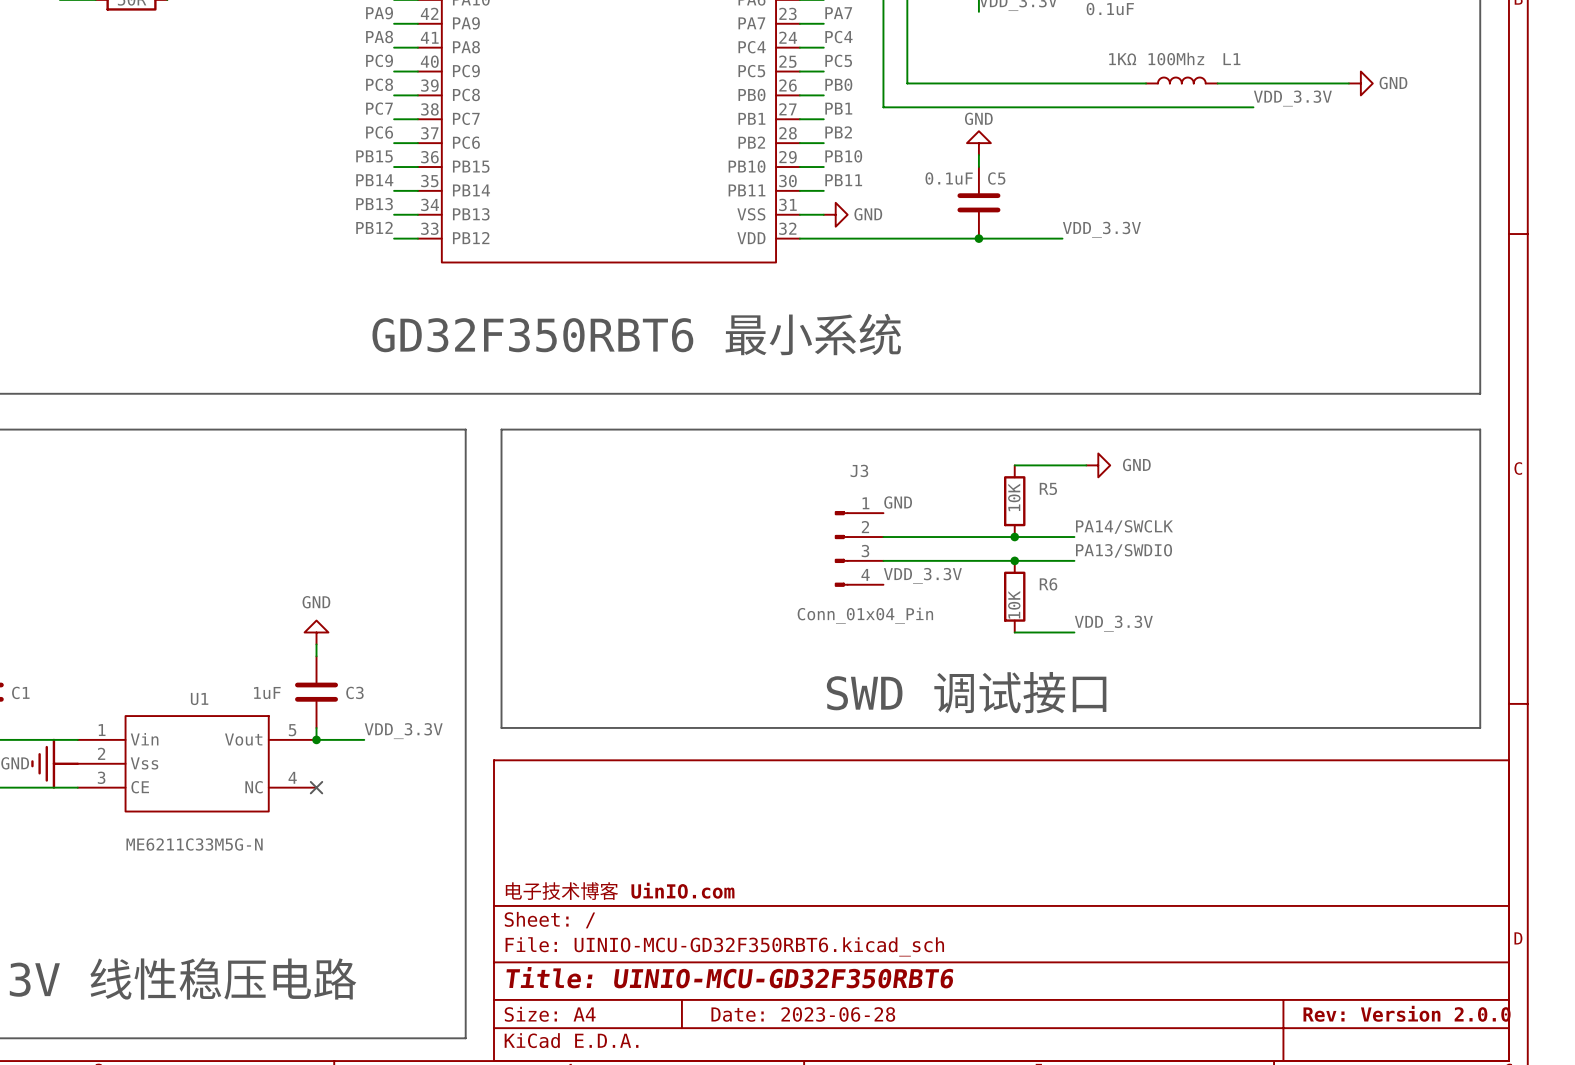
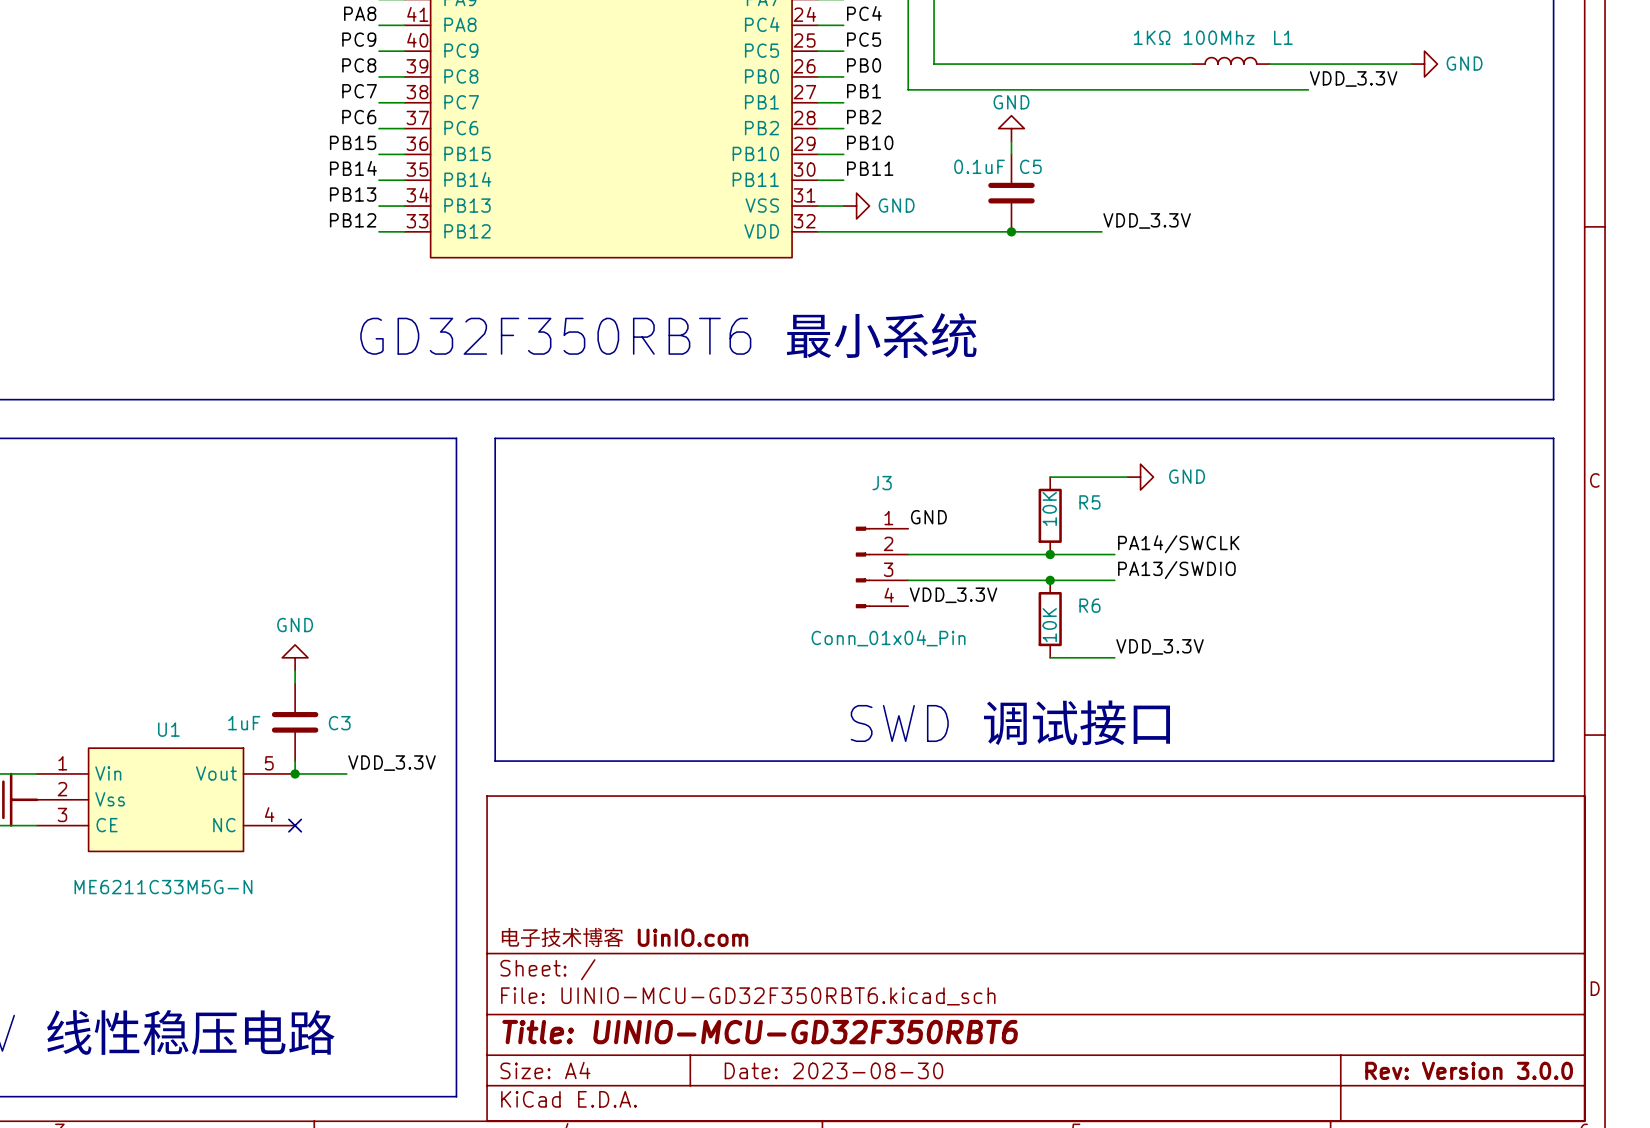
title block: Rev: Version 2.0.0 (1407, 1013) -> Rev: Version 3.0.0 (1469, 1070)
title block: Date: 2023-06-28 (803, 1014) -> Date: 2023-08-30 (833, 1070)

